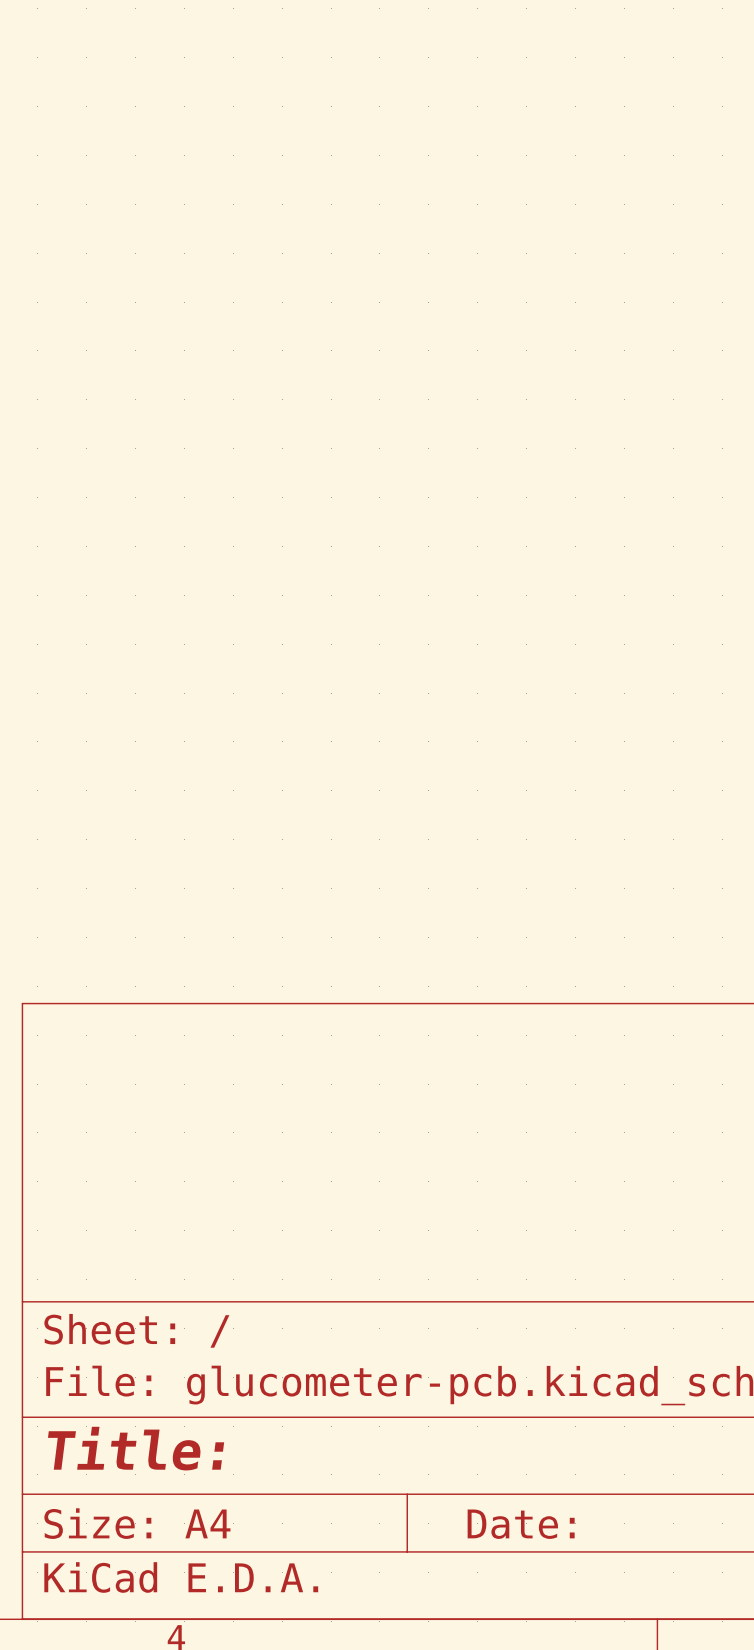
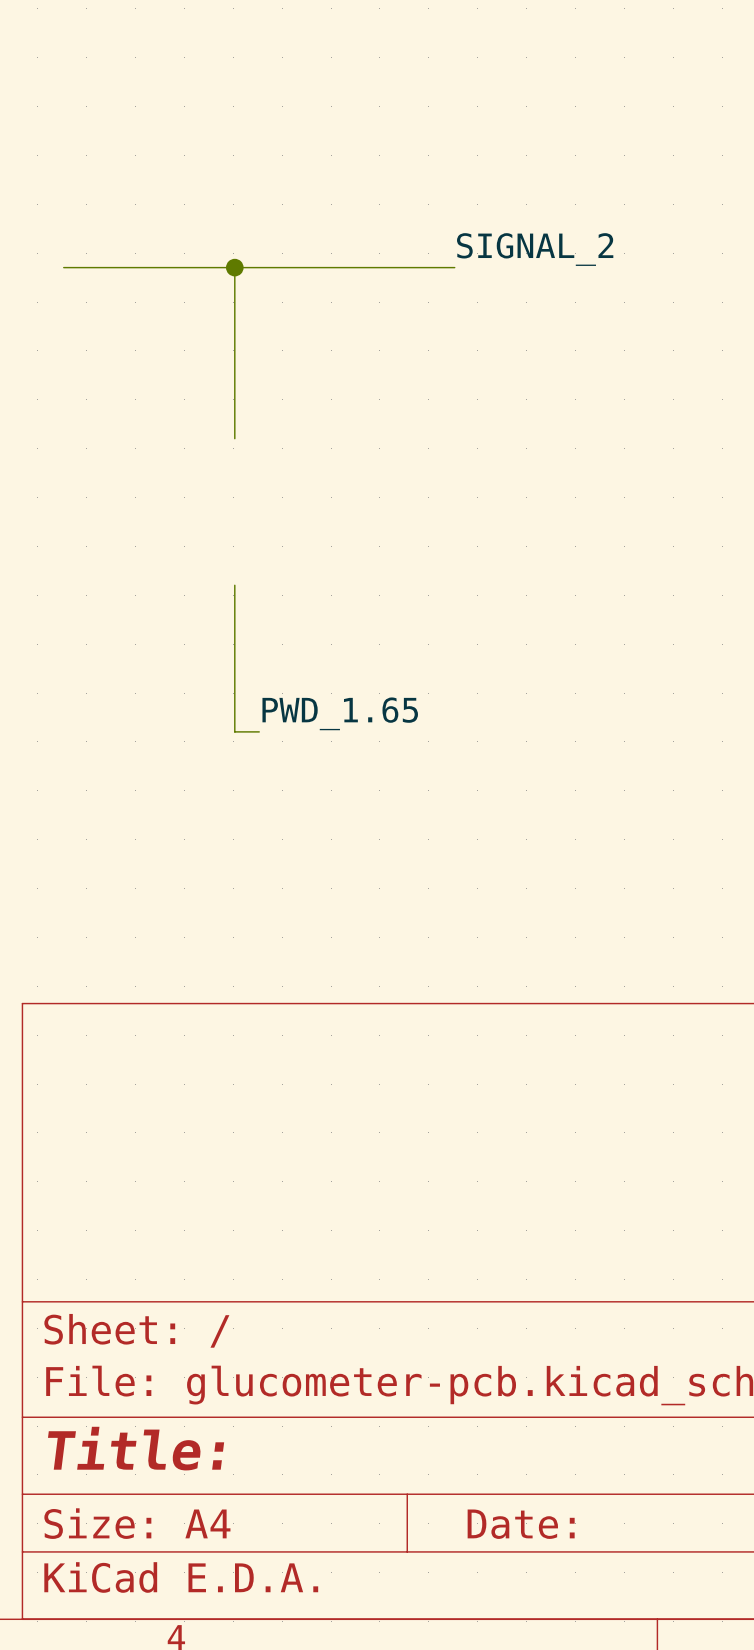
label: none -> SIGNAL_2 (535, 249)
wire: none -> (63, 267) (454, 267)
wire: none -> (234, 267) (234, 438)
junction: none -> (234, 267)
wire: none -> (234, 585) (234, 731) (259, 731)
label: none -> PWD_1.65 (340, 713)

